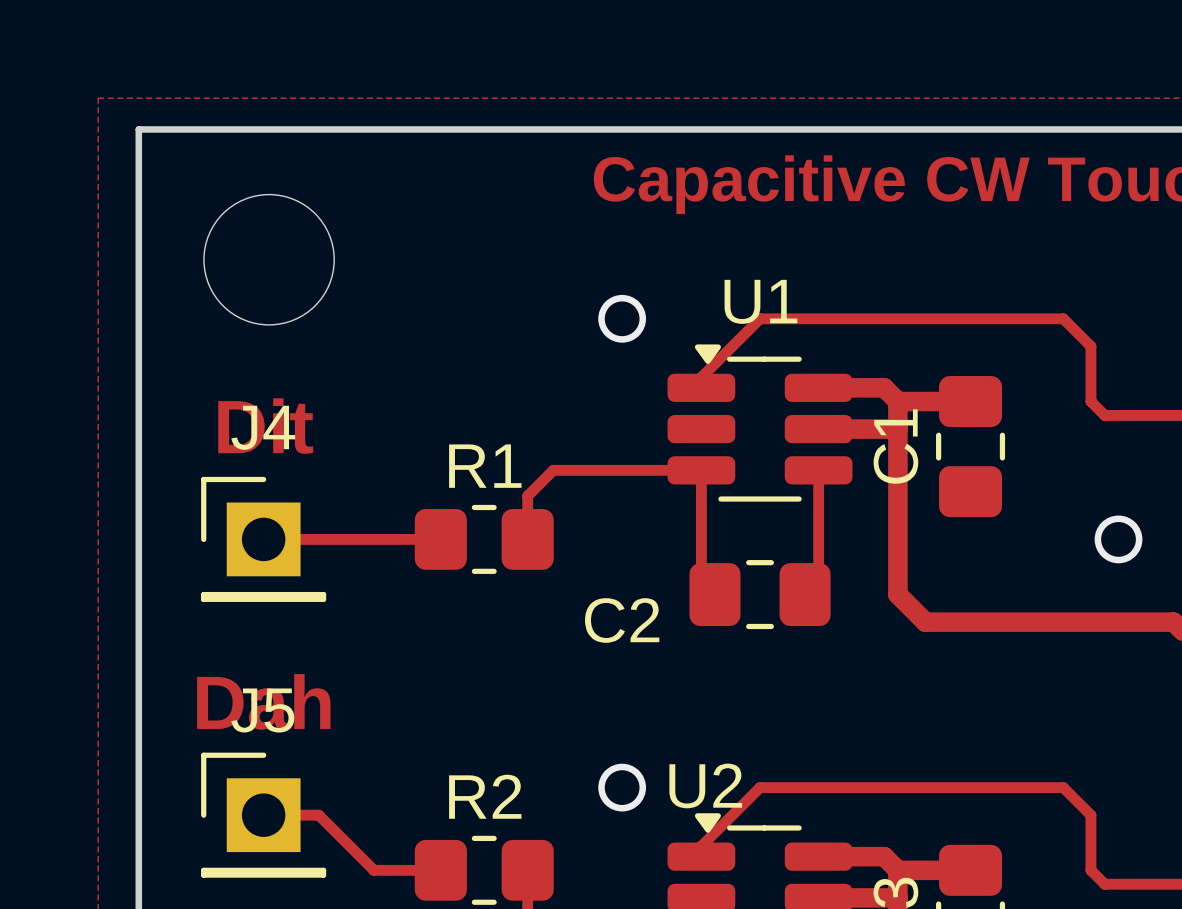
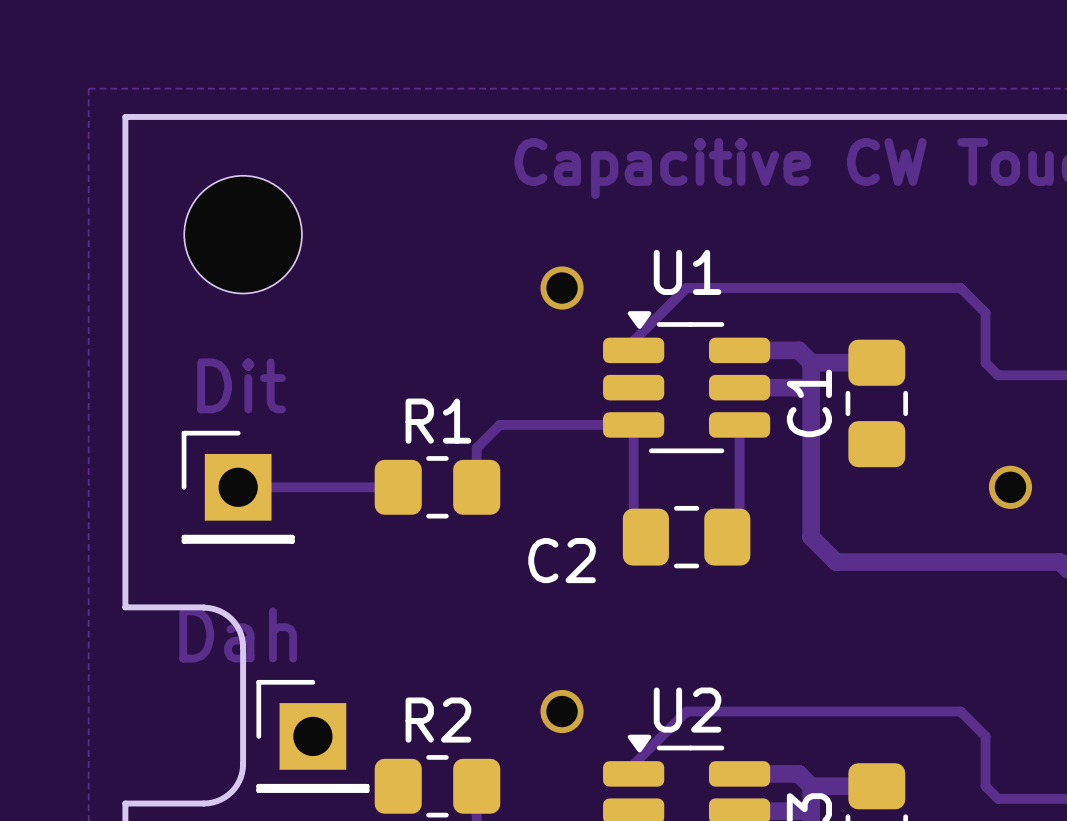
J4 name: J4 (263, 427) -> none
board edge: (138, 672) (138, 889) -> (203, 607) (218, 610) (227, 615) (237, 627) (241, 636) (243, 764) (240, 777) (228, 794) (212, 802) (125, 803)
board edge: none -> (125, 607) (203, 607)
U2 name position: U2 (705, 785) -> U2 (687, 710)
track: (263, 815) (318, 815) (373, 870) (440, 870) -> none
J5: (263, 815) -> none
part: none -> (312, 736)

